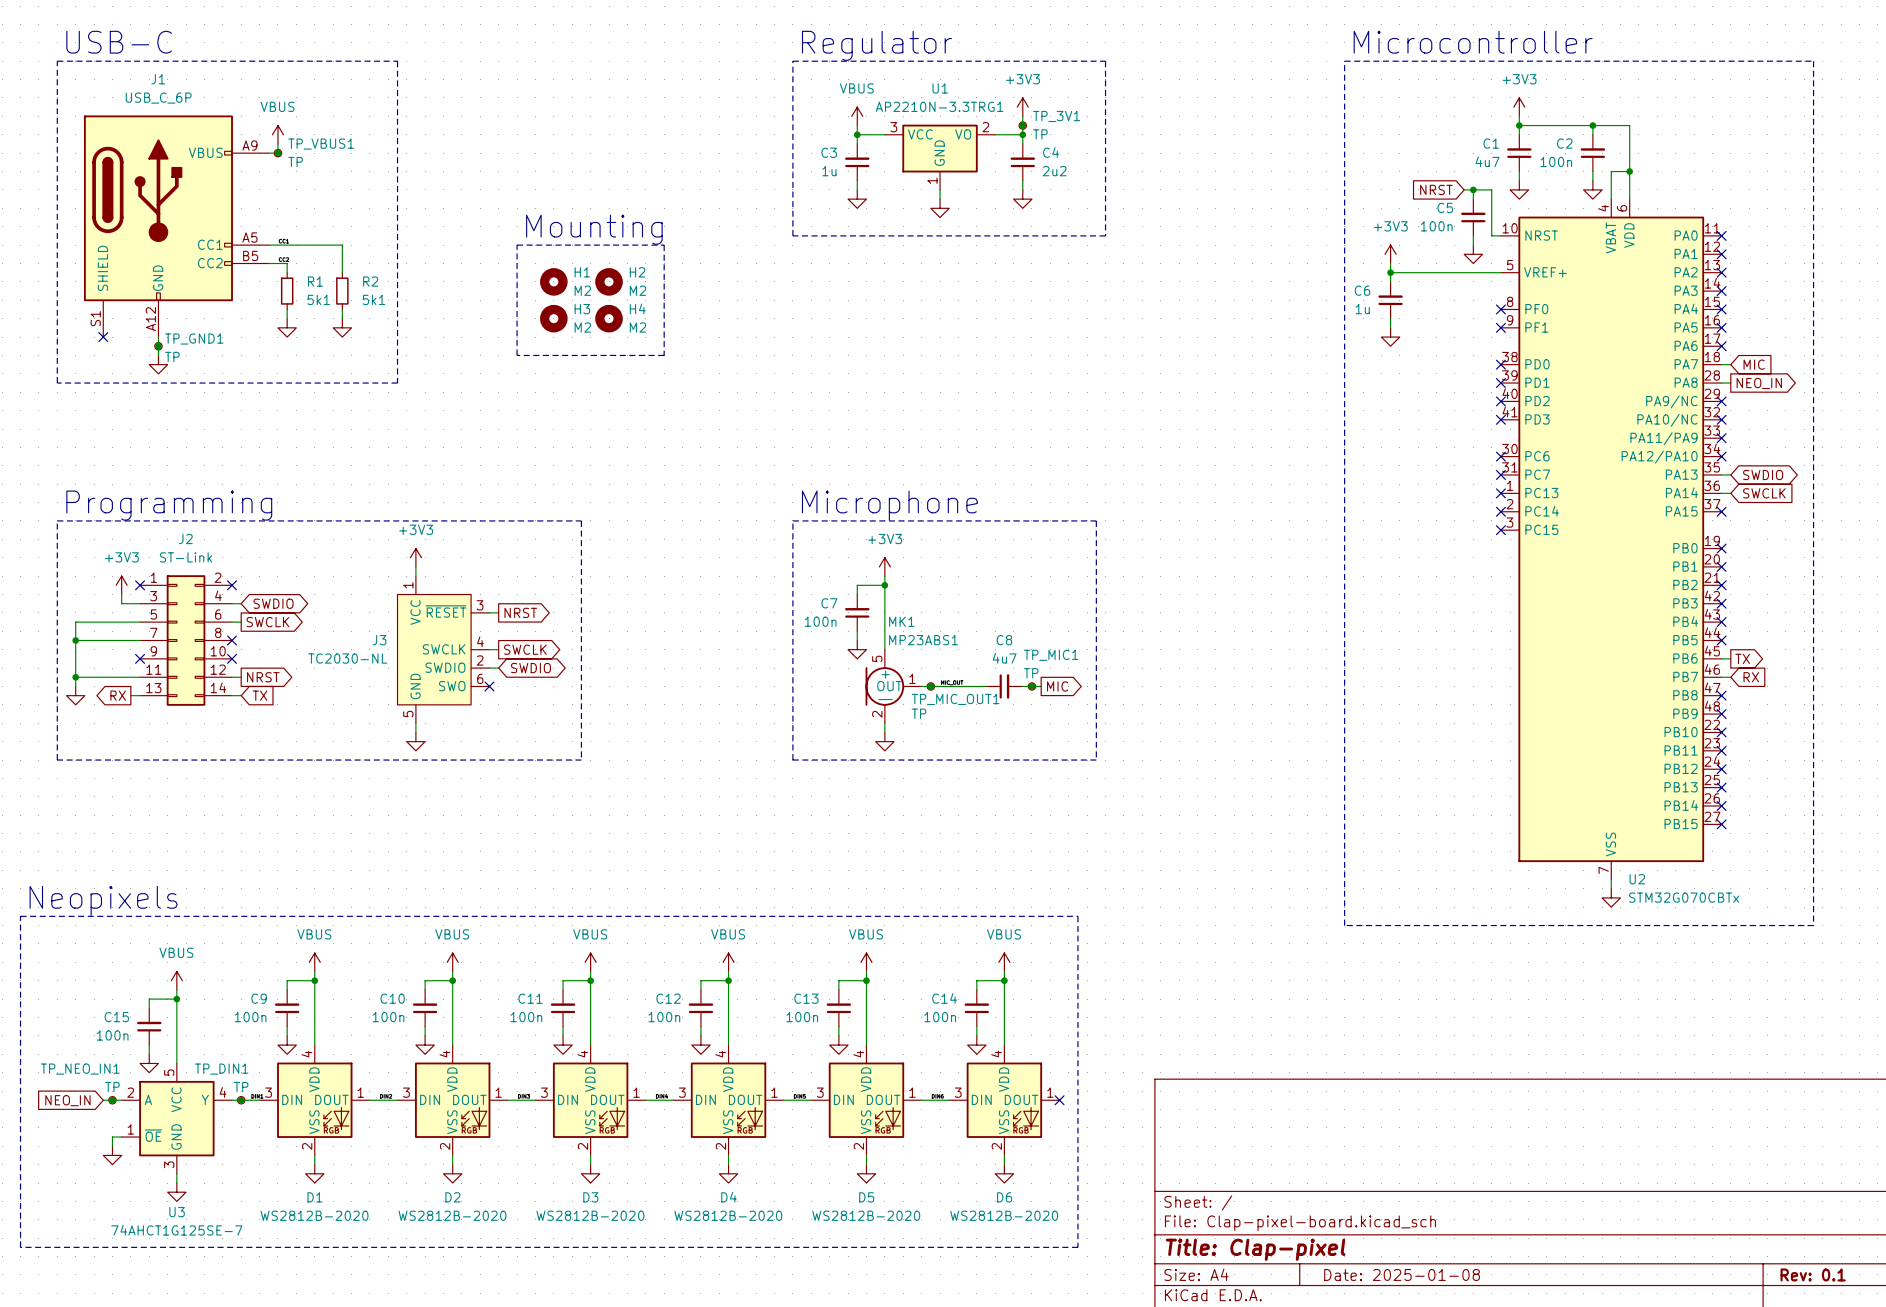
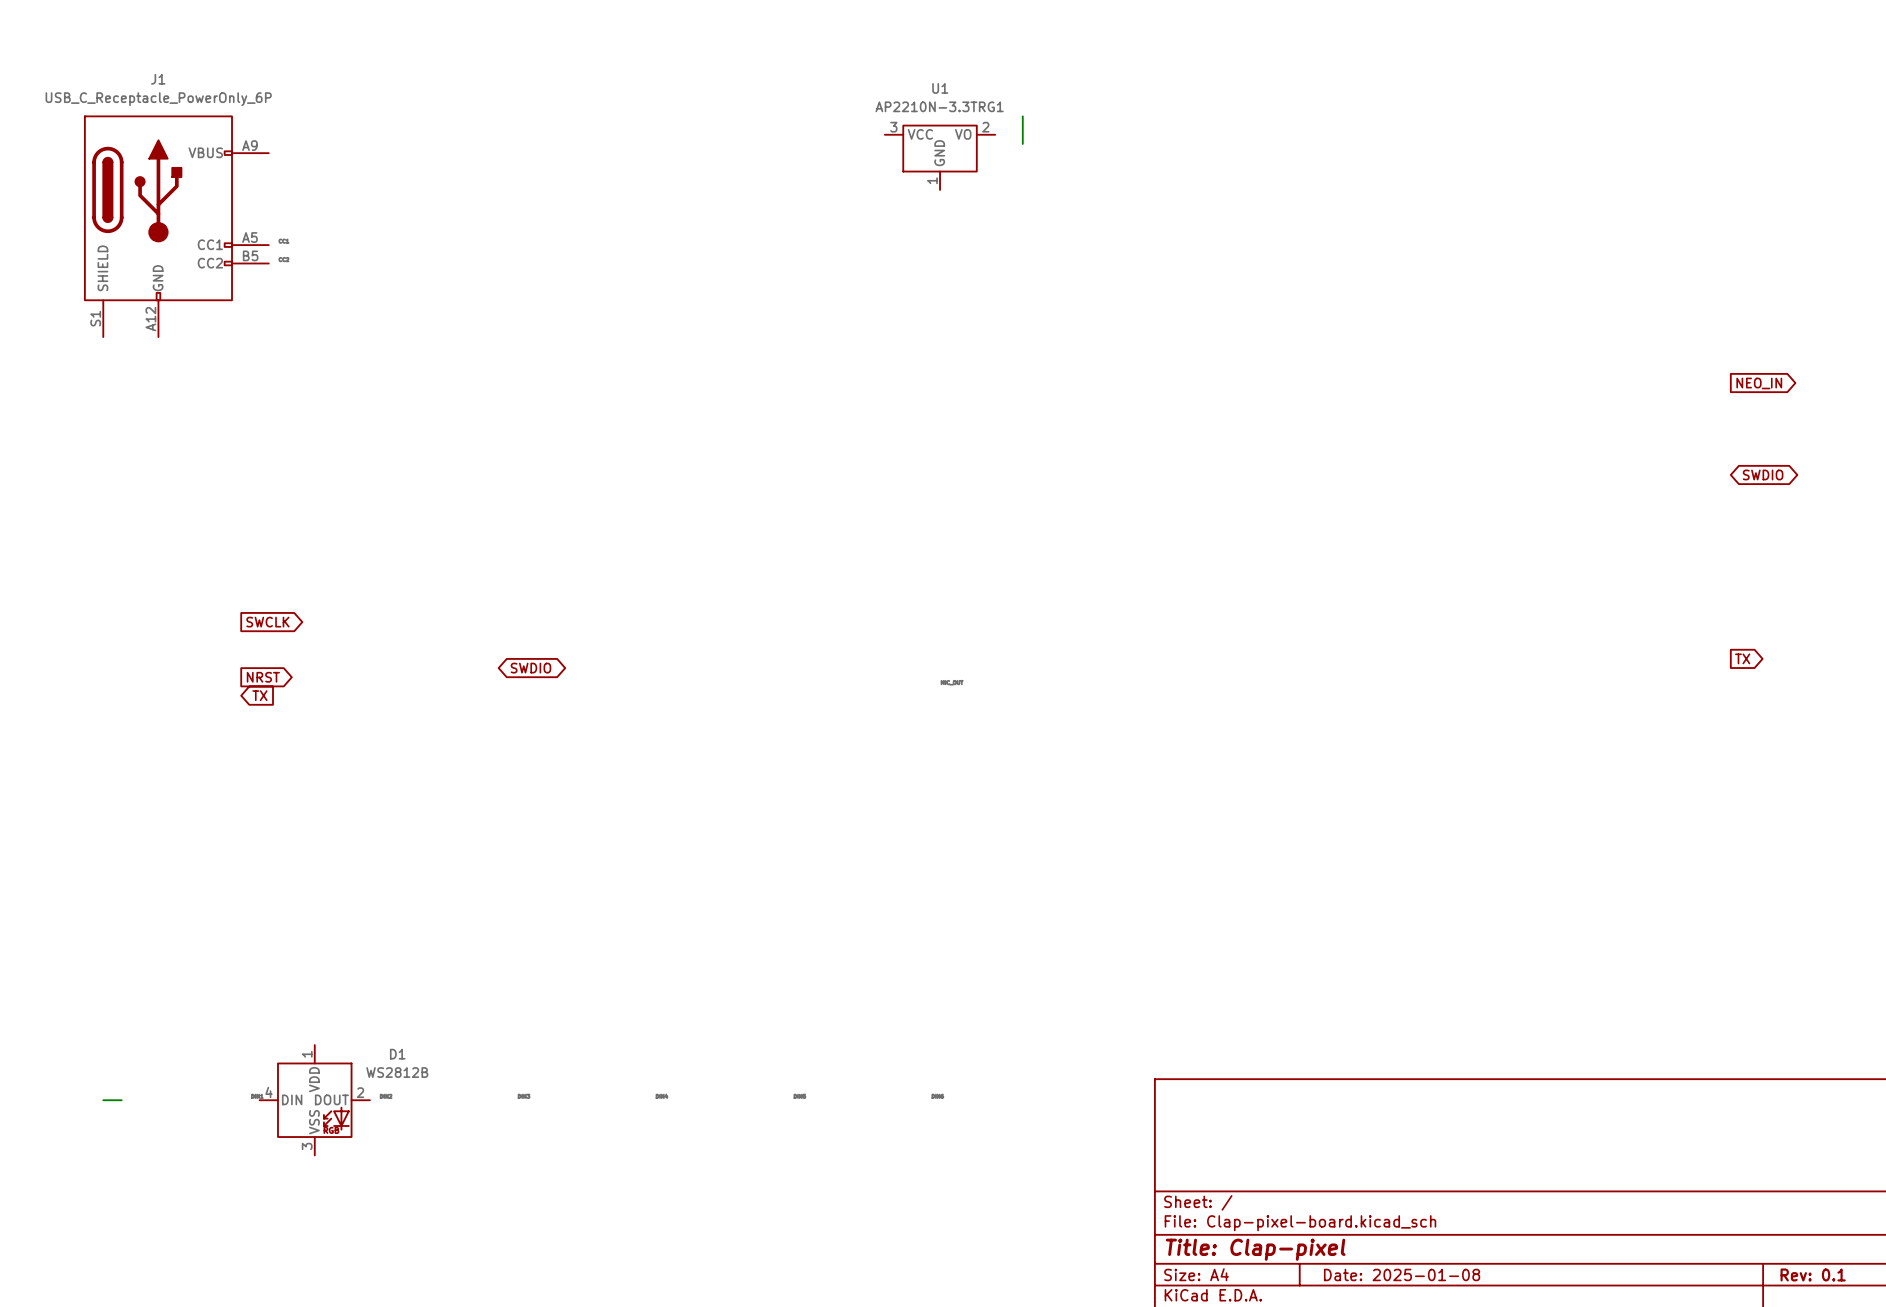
text: USB-C (119, 42) -> none
text: Microcontroller (1473, 42) -> none
text: Regulator (876, 45) -> none
line: (57, 61) (397, 61) (397, 383) (57, 383) (57, 61) -> none
line: (792, 61) (1105, 61) (1105, 235) (792, 235) (792, 61) -> none
line: (1344, 61) (1813, 61) (1813, 925) (1344, 925) (1344, 61) -> none
J1 value: USB_C_6P (158, 98) -> USB_C_Receptacle_PowerOnly_6P (158, 99)
power symbol: +3V3 (1022, 107) -> none
power symbol: +3V3 (1519, 107) -> none
power symbol: VBUS (857, 116) -> none
wire: (1519, 116) (1519, 134) -> none
wire: (857, 125) (857, 143) -> none
junction: (1022, 125) -> none
TP_3V1: TP (1022, 125) -> none
wire: (1519, 125) (1629, 125) (1629, 199) -> none
junction: (1519, 125) -> none
wire: (1592, 125) (1592, 134) -> none
junction: (1592, 125) -> none
power symbol: VBUS (277, 134) -> none
wire: (857, 134) (884, 134) -> none
junction: (857, 134) -> none
wire: (995, 134) (1022, 134) -> none
junction: (1022, 134) -> none
wire: (277, 143) (277, 153) (268, 153) -> none
junction: (277, 153) -> none
TP_VBUS1: TP (277, 153) -> none
C1: 4u7 (1519, 153) -> none
C2: 100n (1592, 153) -> none
C3: 1u (857, 162) -> none
C4: 2u2 (1022, 162) -> none
wire: (1519, 171) (1519, 180) -> none
wire: (1592, 171) (1592, 180) -> none
wire: (1629, 171) (1611, 171) (1611, 199) -> none
junction: (1629, 171) -> none
wire: (857, 180) (857, 189) -> none
wire: (1022, 180) (1022, 189) -> none
wire: (940, 189) (940, 199) -> none
global label: NRST (1436, 189) -> none
wire: (1464, 189) (1491, 189) (1491, 235) (1500, 235) -> none
wire: (1473, 189) (1473, 199) -> none
junction: (1473, 189) -> none
power symbol: (1519, 189) -> none
power symbol: (1592, 189) -> none
power symbol: (857, 199) -> none
power symbol: (1022, 199) -> none
power symbol: (940, 208) -> none
C5: 100n (1473, 217) -> none
text: Mounting (594, 229) -> none
wire: (1473, 235) (1473, 245) -> none
no-connect mark: (1721, 235) -> none
wire: (268, 245) (342, 245) (342, 272) -> none
line: (517, 245) (664, 245) (664, 355) (517, 355) (517, 245) -> none
power symbol: +3V3 (1390, 254) -> none
power symbol: (1473, 254) -> none
no-connect mark: (1721, 254) -> none
wire: (268, 263) (287, 263) (287, 272) -> none
wire: (1390, 263) (1390, 281) -> none
wire: (1390, 272) (1500, 272) -> none
junction: (1390, 272) -> none
no-connect mark: (1721, 272) -> none
H1: M2 (553, 281) -> none
H2: M2 (609, 281) -> none
R1: 5k1 (287, 291) -> none
R2: 5k1 (342, 291) -> none
no-connect mark: (1721, 291) -> none
C6: 1u (1390, 300) -> none
wire: (287, 309) (287, 318) -> none
wire: (342, 309) (342, 318) -> none
no-connect mark: (1500, 309) -> none
no-connect mark: (1721, 309) -> none
H3: M2 (553, 318) -> none
H4: M2 (609, 318) -> none
wire: (1390, 318) (1390, 327) -> none
power symbol: (287, 327) -> none
power symbol: (342, 327) -> none
no-connect mark: (1500, 327) -> none
no-connect mark: (1721, 327) -> none
no-connect mark: (103, 337) -> none
wire: (158, 337) (158, 355) -> none
power symbol: (1390, 337) -> none
junction: (158, 346) -> none
TP_GND1: TP (158, 346) -> none
no-connect mark: (1721, 346) -> none
power symbol: (158, 364) -> none
no-connect mark: (1500, 364) -> none
wire: (1721, 364) (1730, 364) -> none
global label: MIC (1754, 364) -> none
no-connect mark: (1500, 383) -> none
wire: (1721, 383) (1730, 383) -> none
no-connect mark: (1500, 401) -> none
no-connect mark: (1721, 401) -> none
no-connect mark: (1500, 419) -> none
no-connect mark: (1721, 419) -> none
no-connect mark: (1721, 438) -> none
no-connect mark: (1500, 456) -> none
no-connect mark: (1721, 456) -> none
no-connect mark: (1500, 474) -> none
wire: (1721, 474) (1730, 474) -> none
no-connect mark: (1500, 493) -> none
wire: (1721, 493) (1730, 493) -> none
global label: SWCLK (1764, 493) -> none
text: Programming (169, 505) -> none
text: Microphone (889, 505) -> none
no-connect mark: (1500, 511) -> none
no-connect mark: (1721, 511) -> none
line: (57, 520) (581, 520) (581, 760) (57, 760) (57, 520) -> none
line: (792, 520) (1096, 520) (1096, 760) (792, 760) (792, 520) -> none
no-connect mark: (1500, 530) -> none
U2: STM32G070CBTx (1611, 539) -> none
no-connect mark: (1721, 548) -> none
power symbol: +3V3 (415, 557) -> none
wire: (415, 566) (415, 576) -> none
power symbol: +3V3 (884, 566) -> none
no-connect mark: (1721, 566) -> none
wire: (884, 576) (884, 649) -> none
power symbol: +3V3 (121, 585) -> none
no-connect mark: (140, 585) -> none
no-connect mark: (232, 585) -> none
wire: (884, 585) (857, 585) (857, 594) -> none
junction: (884, 585) -> none
no-connect mark: (1721, 585) -> none
wire: (121, 594) (121, 603) (140, 603) -> none
wire: (232, 603) (241, 603) -> none
global label: SWDIO (273, 603) -> none
no-connect mark: (1721, 603) -> none
wire: (489, 612) (498, 612) -> none
global label: NRST (520, 612) -> none
C7: 100n (857, 612) -> none
wire: (140, 622) (75, 622) (75, 686) -> none
wire: (232, 622) (241, 622) -> none
no-connect mark: (1721, 622) -> none
wire: (857, 631) (857, 640) -> none
wire: (75, 640) (140, 640) -> none
junction: (75, 640) -> none
J2: ST-Link (186, 640) -> none
no-connect mark: (232, 640) -> none
no-connect mark: (1721, 640) -> none
J3: TC2030-NL (443, 649) -> none
wire: (489, 649) (498, 649) -> none
global label: SWCLK (525, 649) -> none
power symbol: (857, 649) -> none
no-connect mark: (140, 658) -> none
no-connect mark: (232, 658) -> none
wire: (1721, 658) (1730, 658) -> none
wire: (489, 668) (498, 668) -> none
wire: (75, 677) (140, 677) -> none
junction: (75, 677) -> none
wire: (232, 677) (241, 677) -> none
wire: (1721, 677) (1730, 677) -> none
global label: RX (1751, 677) -> none
no-connect mark: (489, 686) -> none
MK1: MP23ABS1 (893, 686) -> none
wire: (921, 686) (986, 686) -> none
junction: (930, 686) -> none
TP_MIC_OUT1: TP (930, 686) -> none
C8: 4u7 (1004, 686) -> none
wire: (1022, 686) (1041, 686) -> none
junction: (1031, 686) -> none
TP_MIC1: TP (1031, 686) -> none
global label: MIC (1057, 686) -> none
power symbol: (75, 695) -> none
global label: RX (118, 695) -> none
wire: (130, 695) (140, 695) -> none
wire: (232, 695) (241, 695) -> none
no-connect mark: (1721, 695) -> none
no-connect mark: (1721, 714) -> none
wire: (415, 723) (415, 732) -> none
wire: (884, 723) (884, 732) -> none
no-connect mark: (1721, 732) -> none
power symbol: (415, 741) -> none
power symbol: (884, 741) -> none
no-connect mark: (1721, 750) -> none
no-connect mark: (1721, 769) -> none
no-connect mark: (1721, 787) -> none
no-connect mark: (1721, 806) -> none
no-connect mark: (1721, 824) -> none
wire: (1611, 879) (1611, 888) -> none
power symbol: (1611, 897) -> none
text: Neopixels (103, 900) -> none
line: (20, 916) (1077, 916) (1077, 1247) (20, 1247) (20, 916) -> none
power symbol: VBUS (314, 962) -> none
power symbol: VBUS (452, 962) -> none
power symbol: VBUS (590, 962) -> none
power symbol: VBUS (728, 962) -> none
power symbol: VBUS (866, 962) -> none
power symbol: VBUS (1004, 962) -> none
wire: (314, 971) (314, 1045) -> none
wire: (452, 971) (452, 1045) -> none
wire: (590, 971) (590, 1045) -> none
wire: (728, 971) (728, 1045) -> none
wire: (866, 971) (866, 1045) -> none
wire: (1004, 971) (1004, 1045) -> none
power symbol: VBUS (176, 980) -> none
wire: (314, 980) (287, 980) (287, 989) -> none
junction: (314, 980) -> none
wire: (452, 980) (425, 980) (425, 989) -> none
junction: (452, 980) -> none
wire: (590, 980) (563, 980) (563, 989) -> none
junction: (590, 980) -> none
wire: (728, 980) (700, 980) (700, 989) -> none
junction: (728, 980) -> none
wire: (866, 980) (838, 980) (838, 989) -> none
junction: (866, 980) -> none
wire: (1004, 980) (976, 980) (976, 989) -> none
junction: (1004, 980) -> none
wire: (176, 989) (176, 1063) -> none
wire: (176, 999) (149, 999) (149, 1008) -> none
junction: (176, 999) -> none
C9: 100n (287, 1008) -> none
C10: 100n (425, 1008) -> none
C11: 100n (563, 1008) -> none
C12: 100n (700, 1008) -> none
C13: 100n (838, 1008) -> none
C14: 100n (976, 1008) -> none
C15: 100n (149, 1026) -> none
wire: (287, 1026) (287, 1035) -> none
wire: (425, 1026) (425, 1035) -> none
wire: (563, 1026) (563, 1035) -> none
wire: (700, 1026) (700, 1035) -> none
wire: (838, 1026) (838, 1035) -> none
wire: (976, 1026) (976, 1035) -> none
wire: (149, 1045) (149, 1054) -> none
power symbol: (287, 1045) -> none
power symbol: (425, 1045) -> none
power symbol: (563, 1045) -> none
power symbol: (700, 1045) -> none
power symbol: (838, 1045) -> none
power symbol: (976, 1045) -> none
D1 pin number: 4 (306, 1054) -> 1 (307, 1054)
power symbol: (149, 1063) -> none
D1 pin number: 3 (268, 1092) -> 4 (269, 1092)
D1 pin number: 1 (360, 1092) -> 2 (360, 1092)
global label: NEO_IN (67, 1100) -> none
junction: (112, 1100) -> none
TP_NEO_IN1: TP (112, 1100) -> none
wire: (232, 1100) (259, 1100) -> none
junction: (241, 1100) -> none
TP_DIN1: TP (241, 1100) -> none
wire: (369, 1100) (397, 1100) -> none
D2: WS2812B-2020 (452, 1100) -> none
wire: (507, 1100) (535, 1100) -> none
D3: WS2812B-2020 (590, 1100) -> none
wire: (645, 1100) (673, 1100) -> none
D4: WS2812B-2020 (728, 1100) -> none
wire: (783, 1100) (811, 1100) -> none
D5: WS2812B-2020 (866, 1100) -> none
wire: (921, 1100) (949, 1100) -> none
D6: WS2812B-2020 (1004, 1100) -> none
no-connect mark: (1059, 1100) -> none
U3: 74AHCT1G125SE-7 (176, 1118) -> none
wire: (121, 1137) (112, 1137) (112, 1146) -> none
D1 pin number: 2 (307, 1146) -> 3 (307, 1146)
power symbol: (112, 1155) -> none
wire: (314, 1155) (314, 1164) -> none
wire: (452, 1155) (452, 1164) -> none
wire: (590, 1155) (590, 1164) -> none
wire: (728, 1155) (728, 1164) -> none
wire: (866, 1155) (866, 1164) -> none
wire: (1004, 1155) (1004, 1164) -> none
wire: (176, 1173) (176, 1183) -> none
power symbol: (314, 1173) -> none
power symbol: (452, 1173) -> none
power symbol: (590, 1173) -> none
power symbol: (728, 1173) -> none
power symbol: (866, 1173) -> none
power symbol: (1004, 1173) -> none
power symbol: (176, 1192) -> none
D1 name position: D1 (314, 1197) -> D1 (397, 1054)
D1 value: WS2812B-2020 (314, 1215) -> WS2812B (397, 1072)

